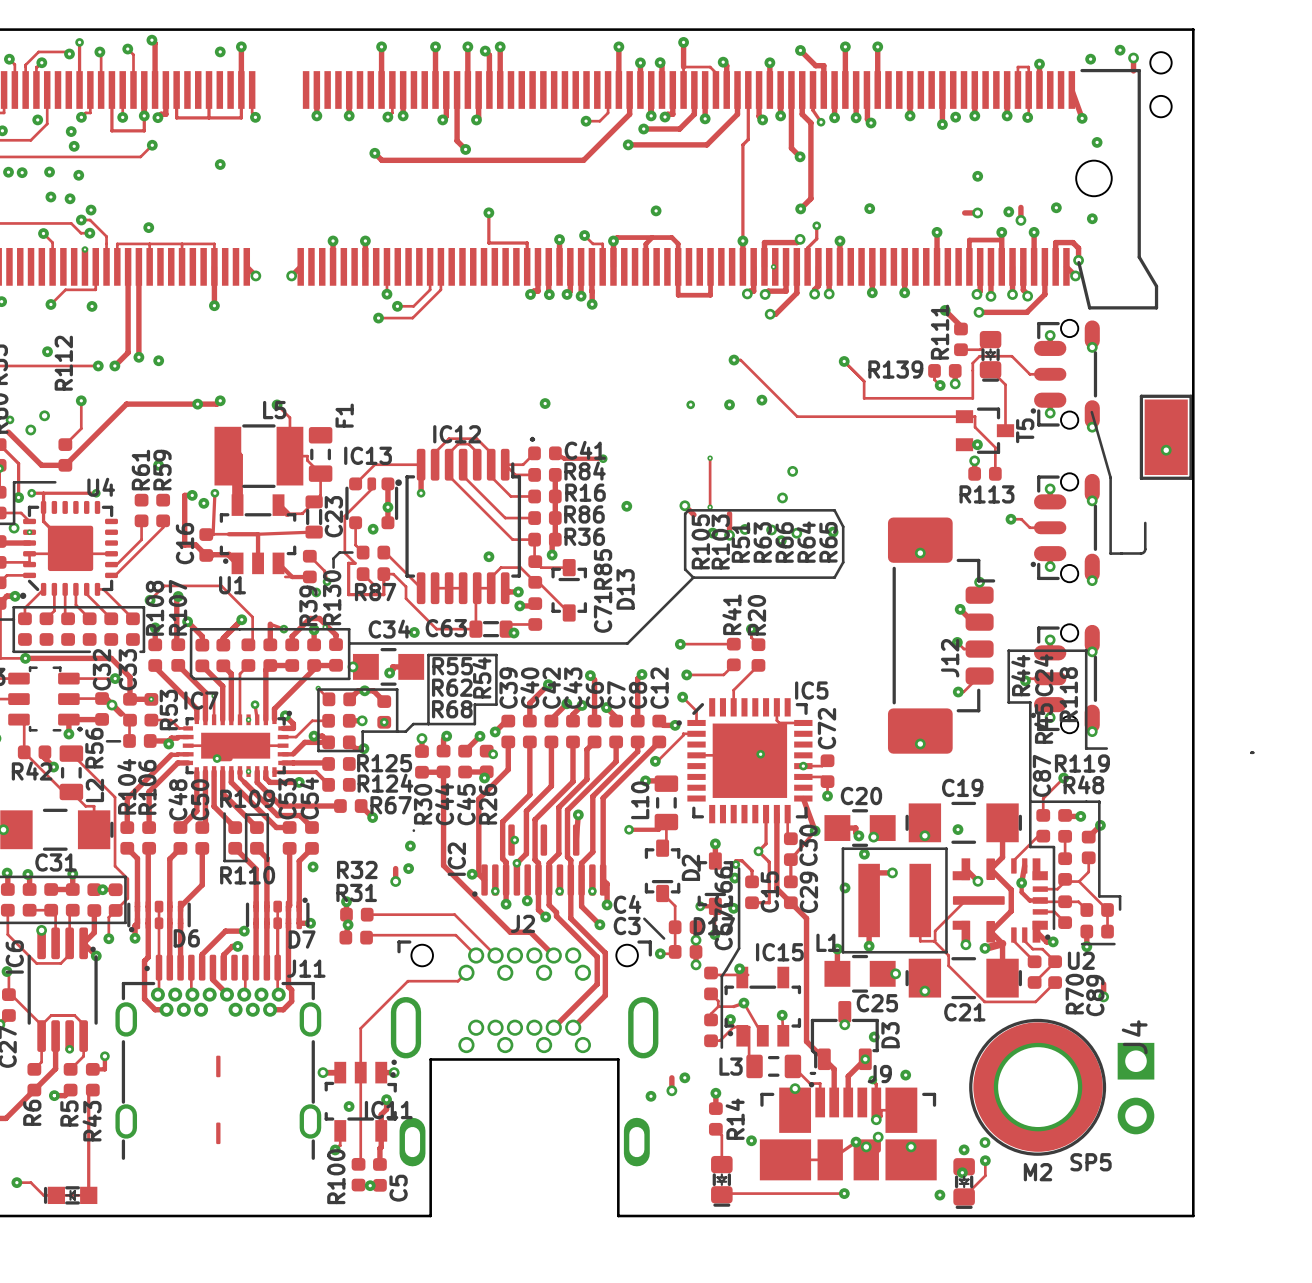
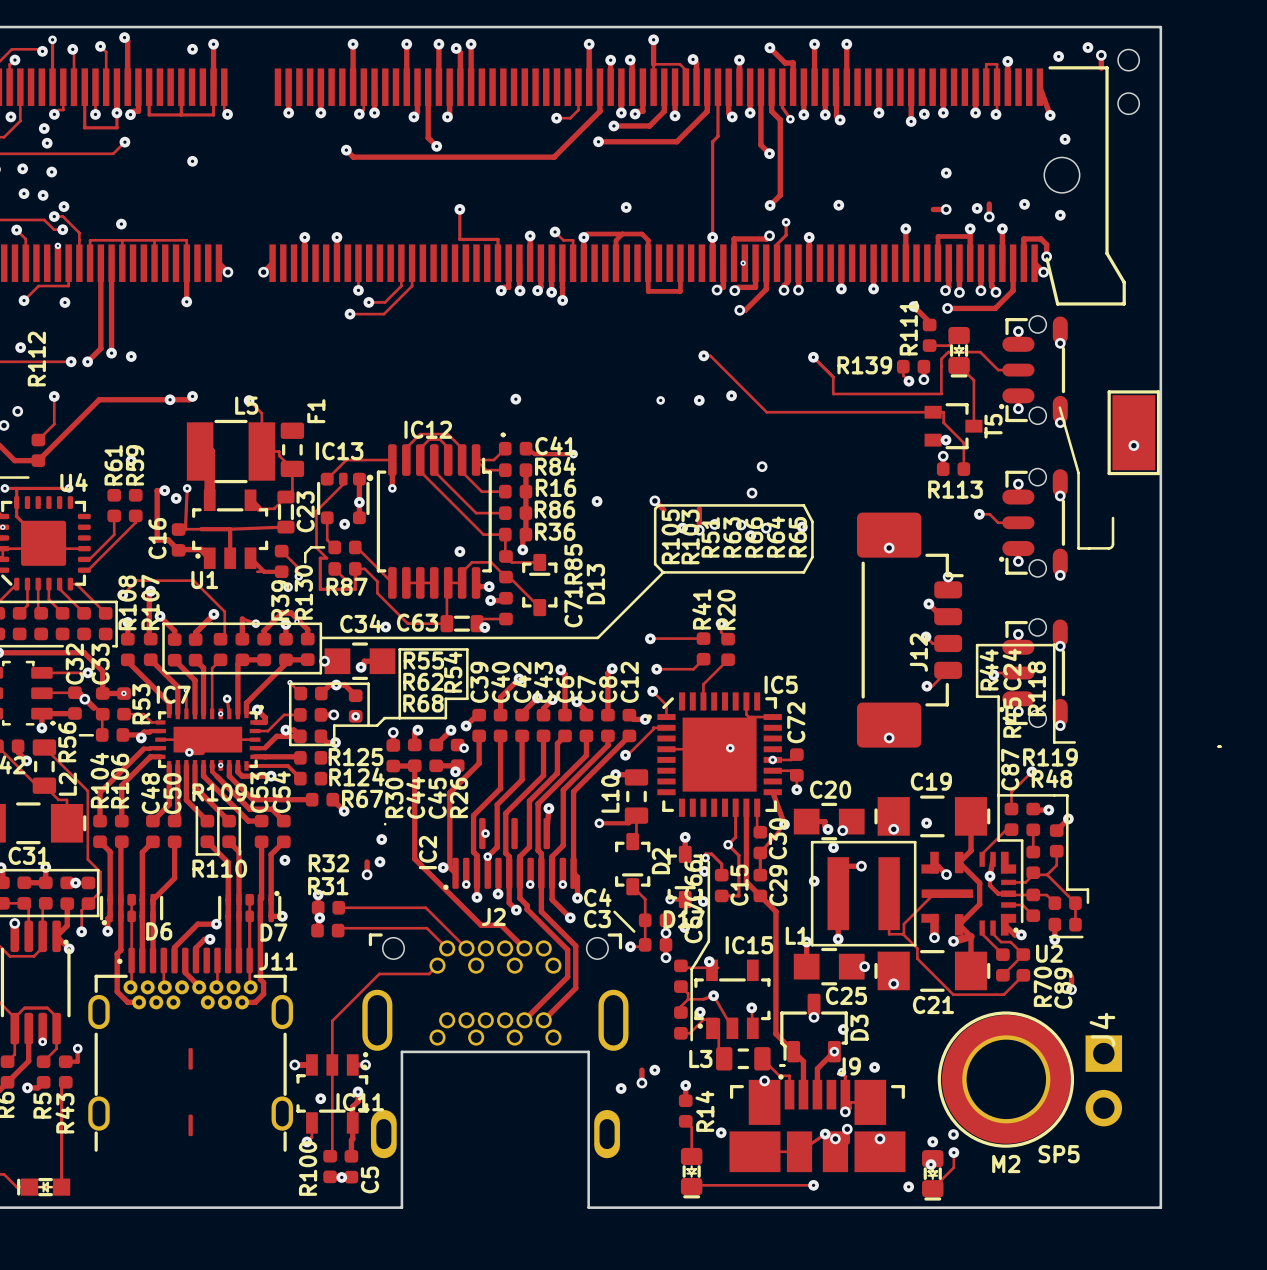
track: (710, 458) (710, 507) -> none
via: (710, 458) -> none
via: (710, 507) -> none

